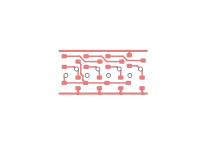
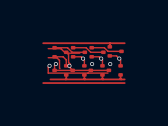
top track: none -> (50, 43) (43, 43)
top track: none -> (48, 48) (60, 48) (65, 53) (79, 53)
top track: none -> (48, 57) (56, 57) (59, 60) (59, 68)
via: (76, 69) -> none
via: (87, 75) -> none
top track: none -> (49, 65) (48, 73) (107, 73)
via: none -> (49, 65)
via: none -> (69, 65)
top track: none -> (124, 83) (43, 83)

